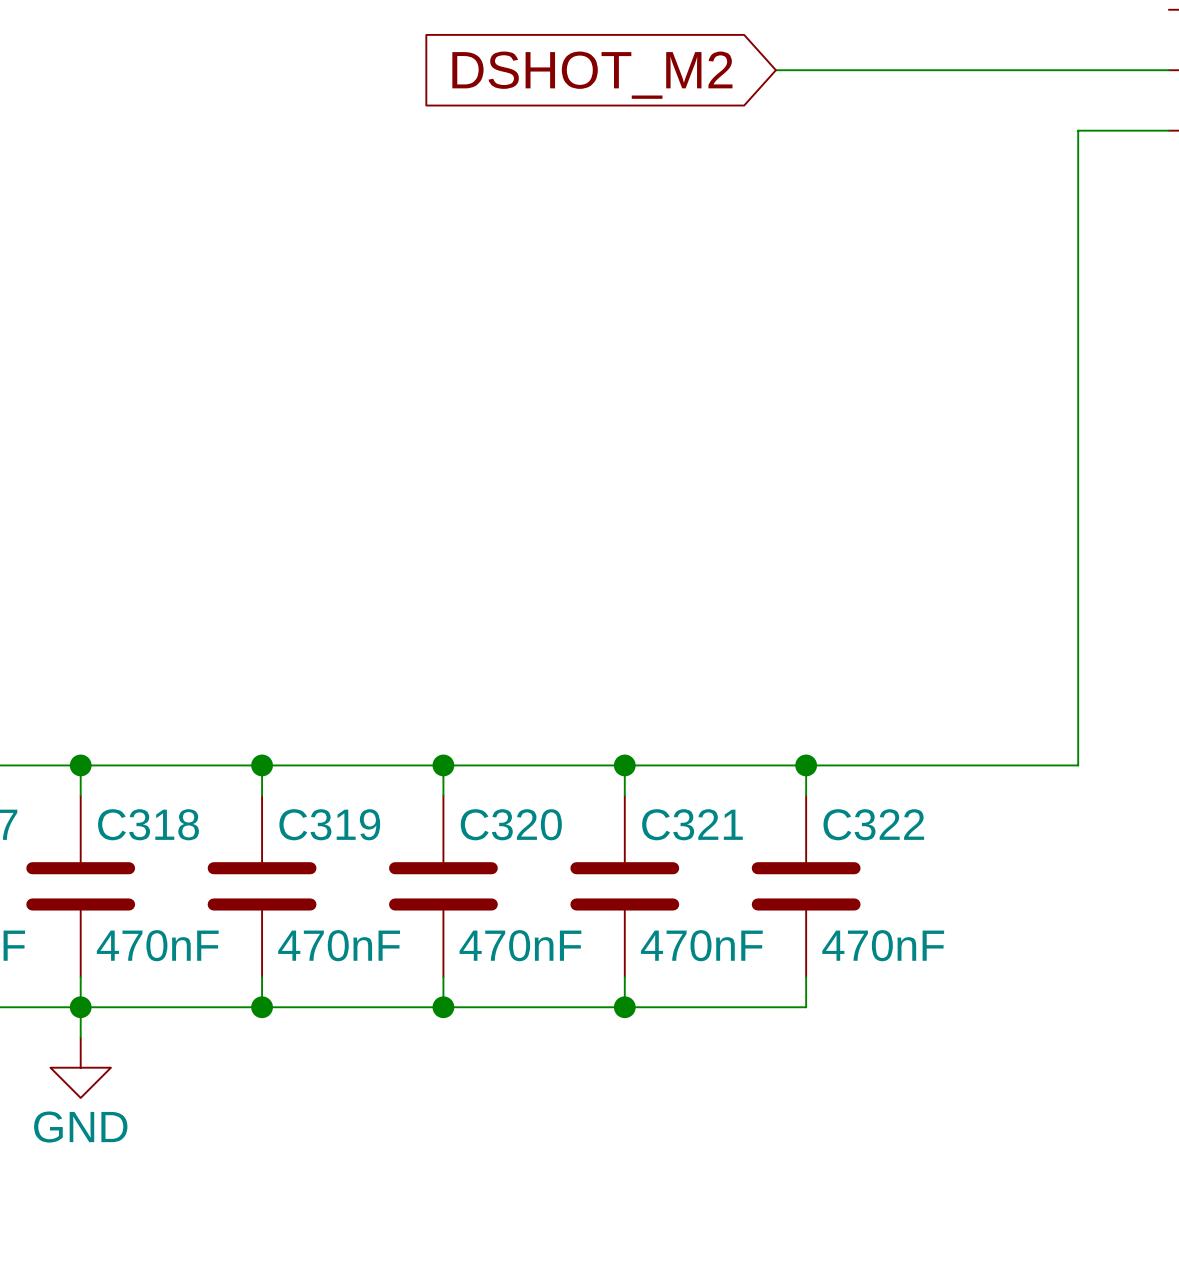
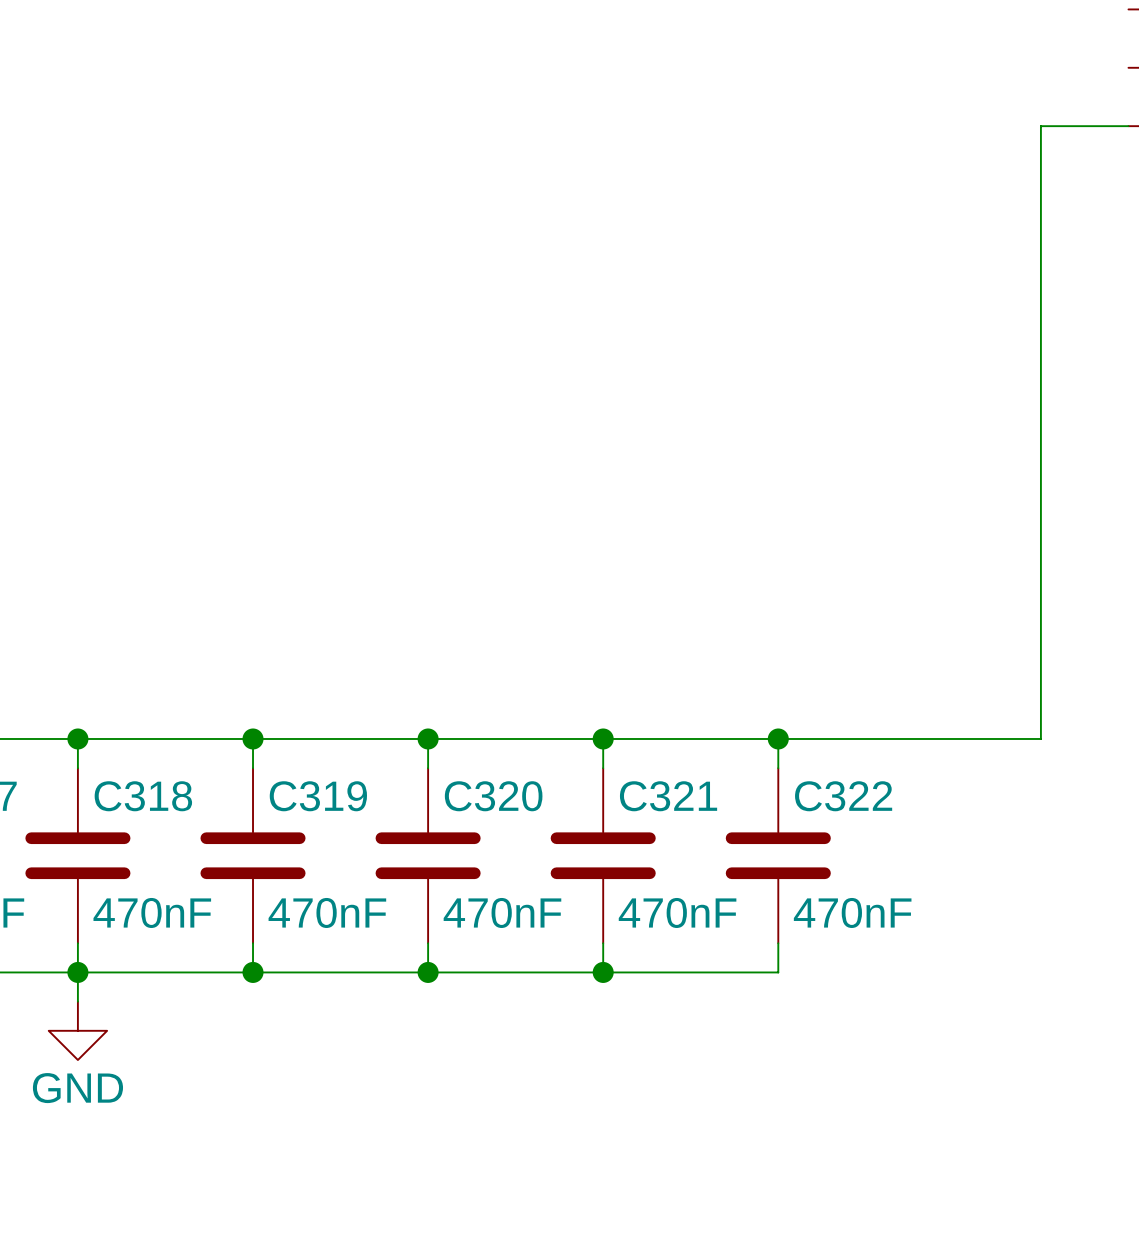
wire: (775, 70) (1168, 70) -> none
global label: DSHOT_M2 (592, 75) -> none

